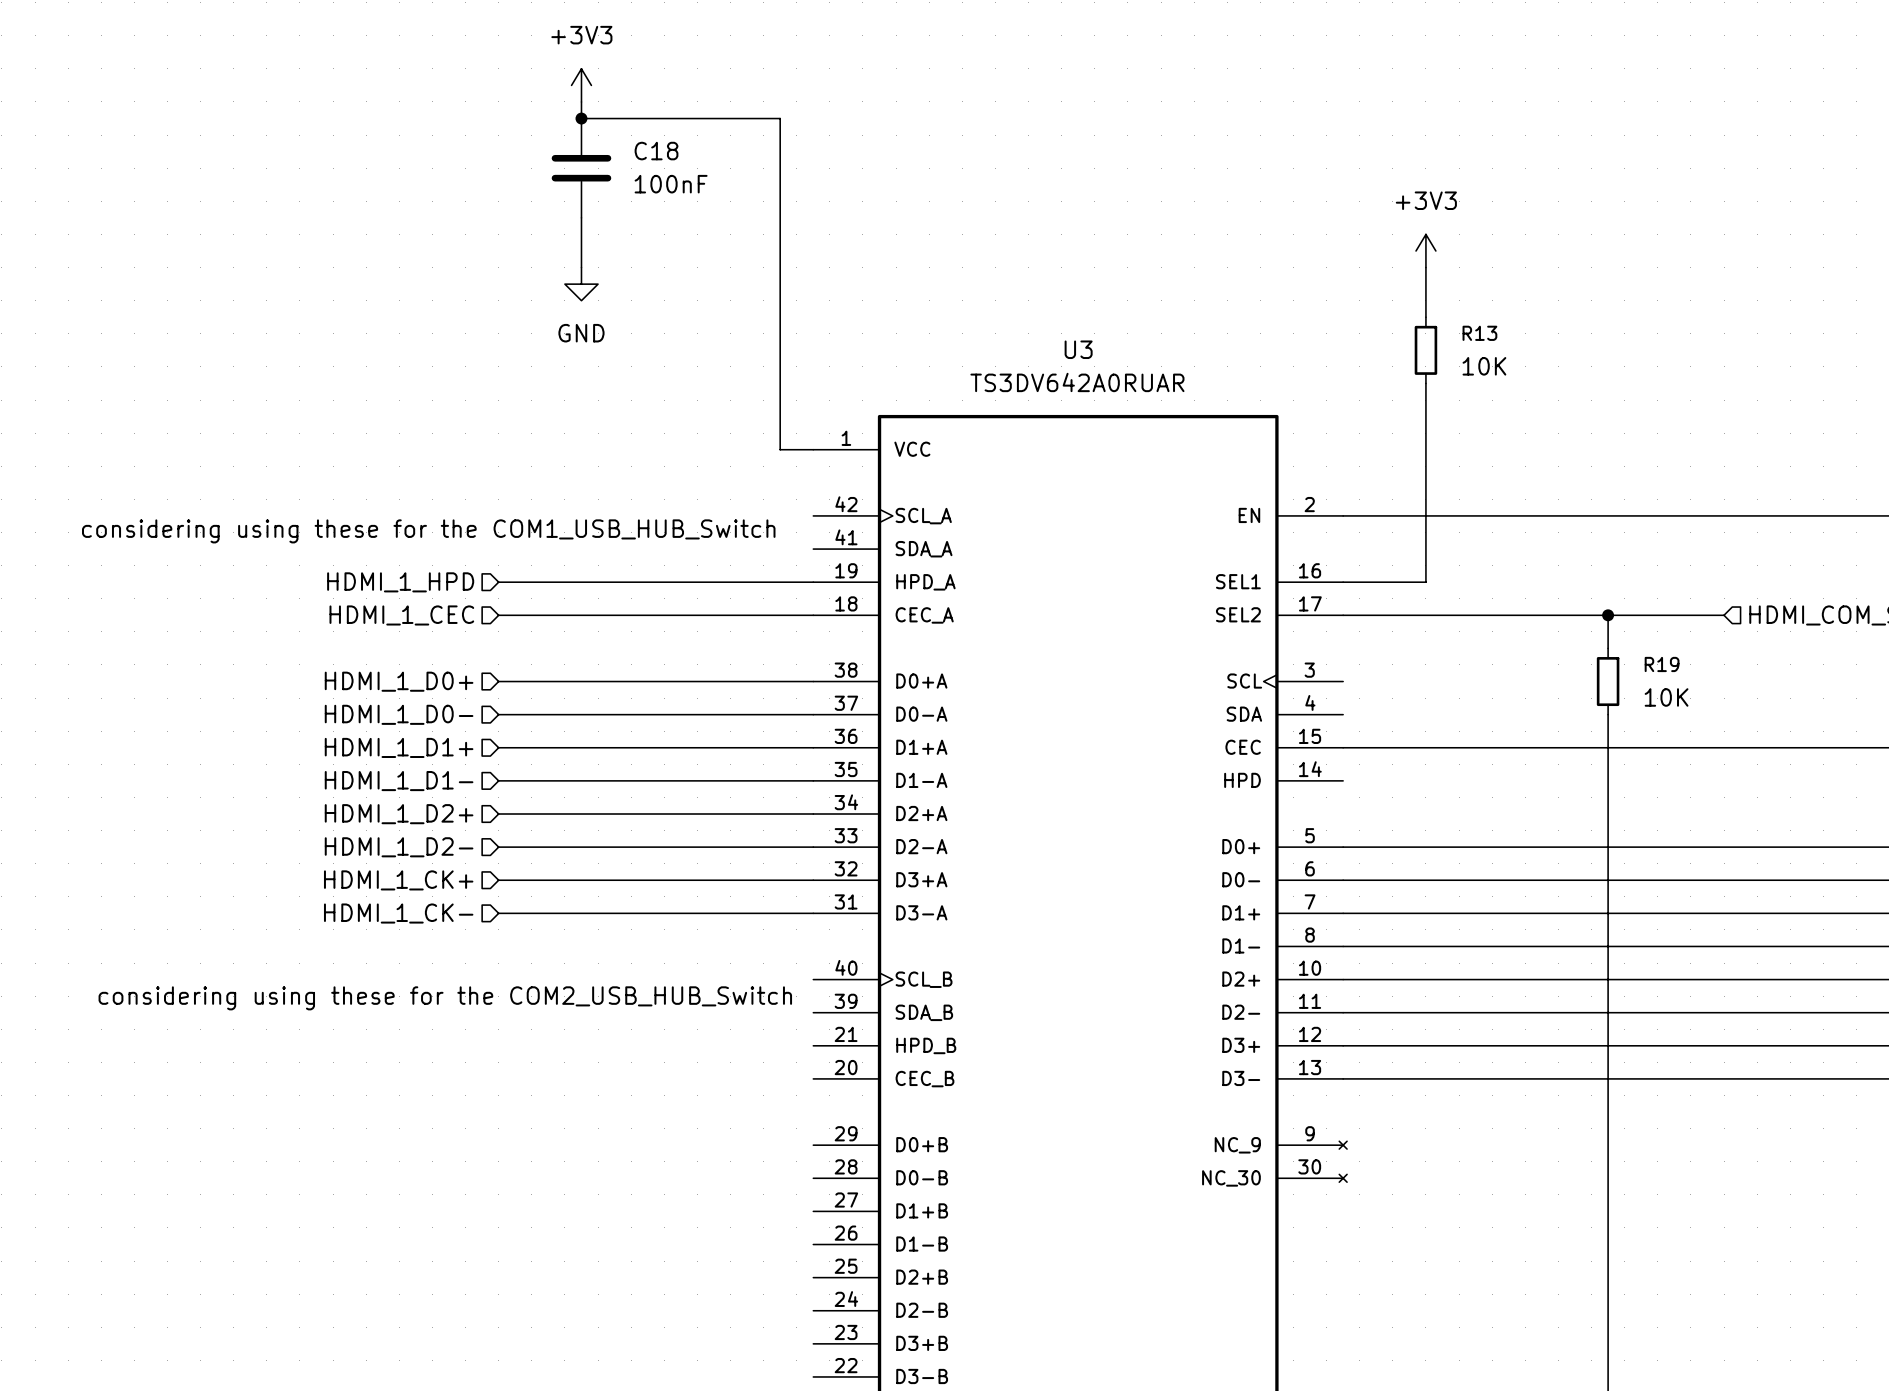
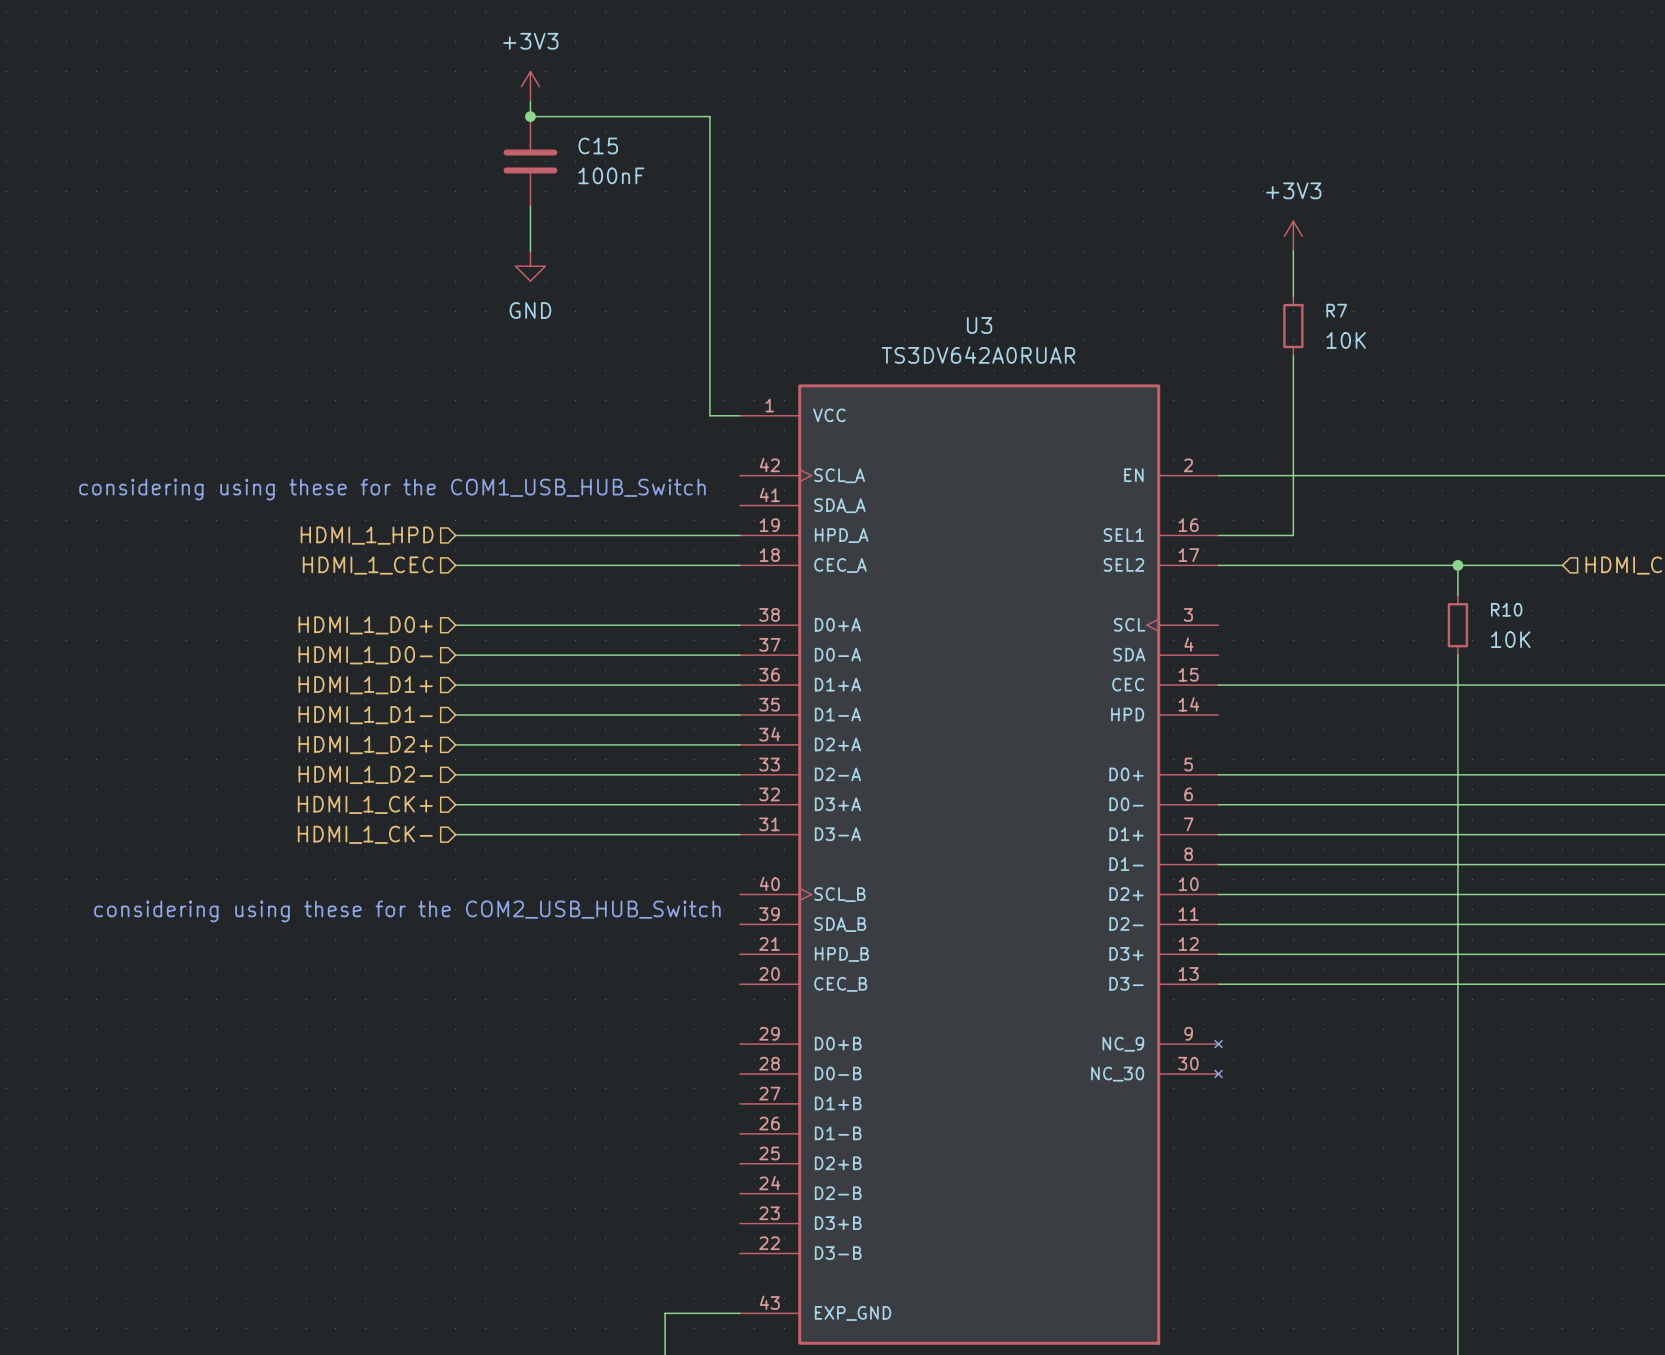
C18 name: C18 (656, 151) -> C15 (598, 145)
R13 name: R13 (1479, 333) -> R7 (1336, 310)
R19 name: R19 (1662, 664) -> R10 (1506, 609)

